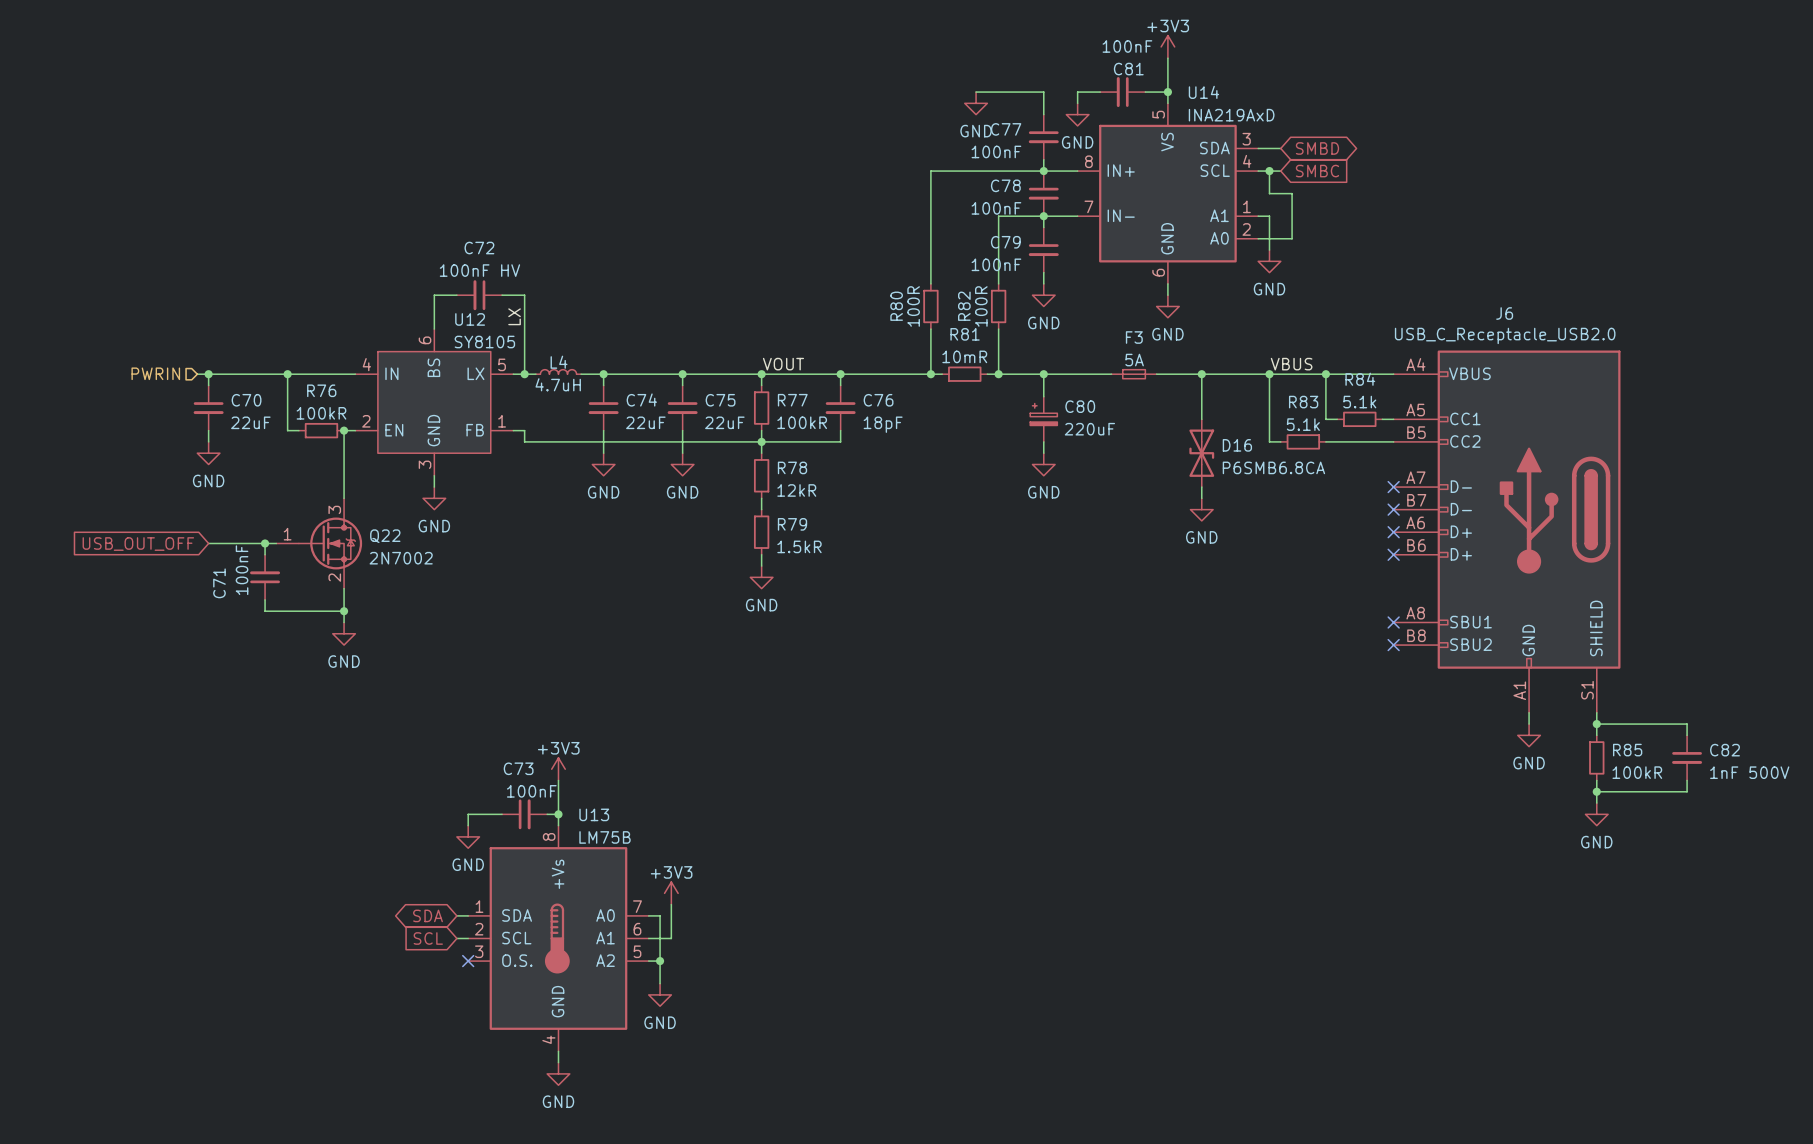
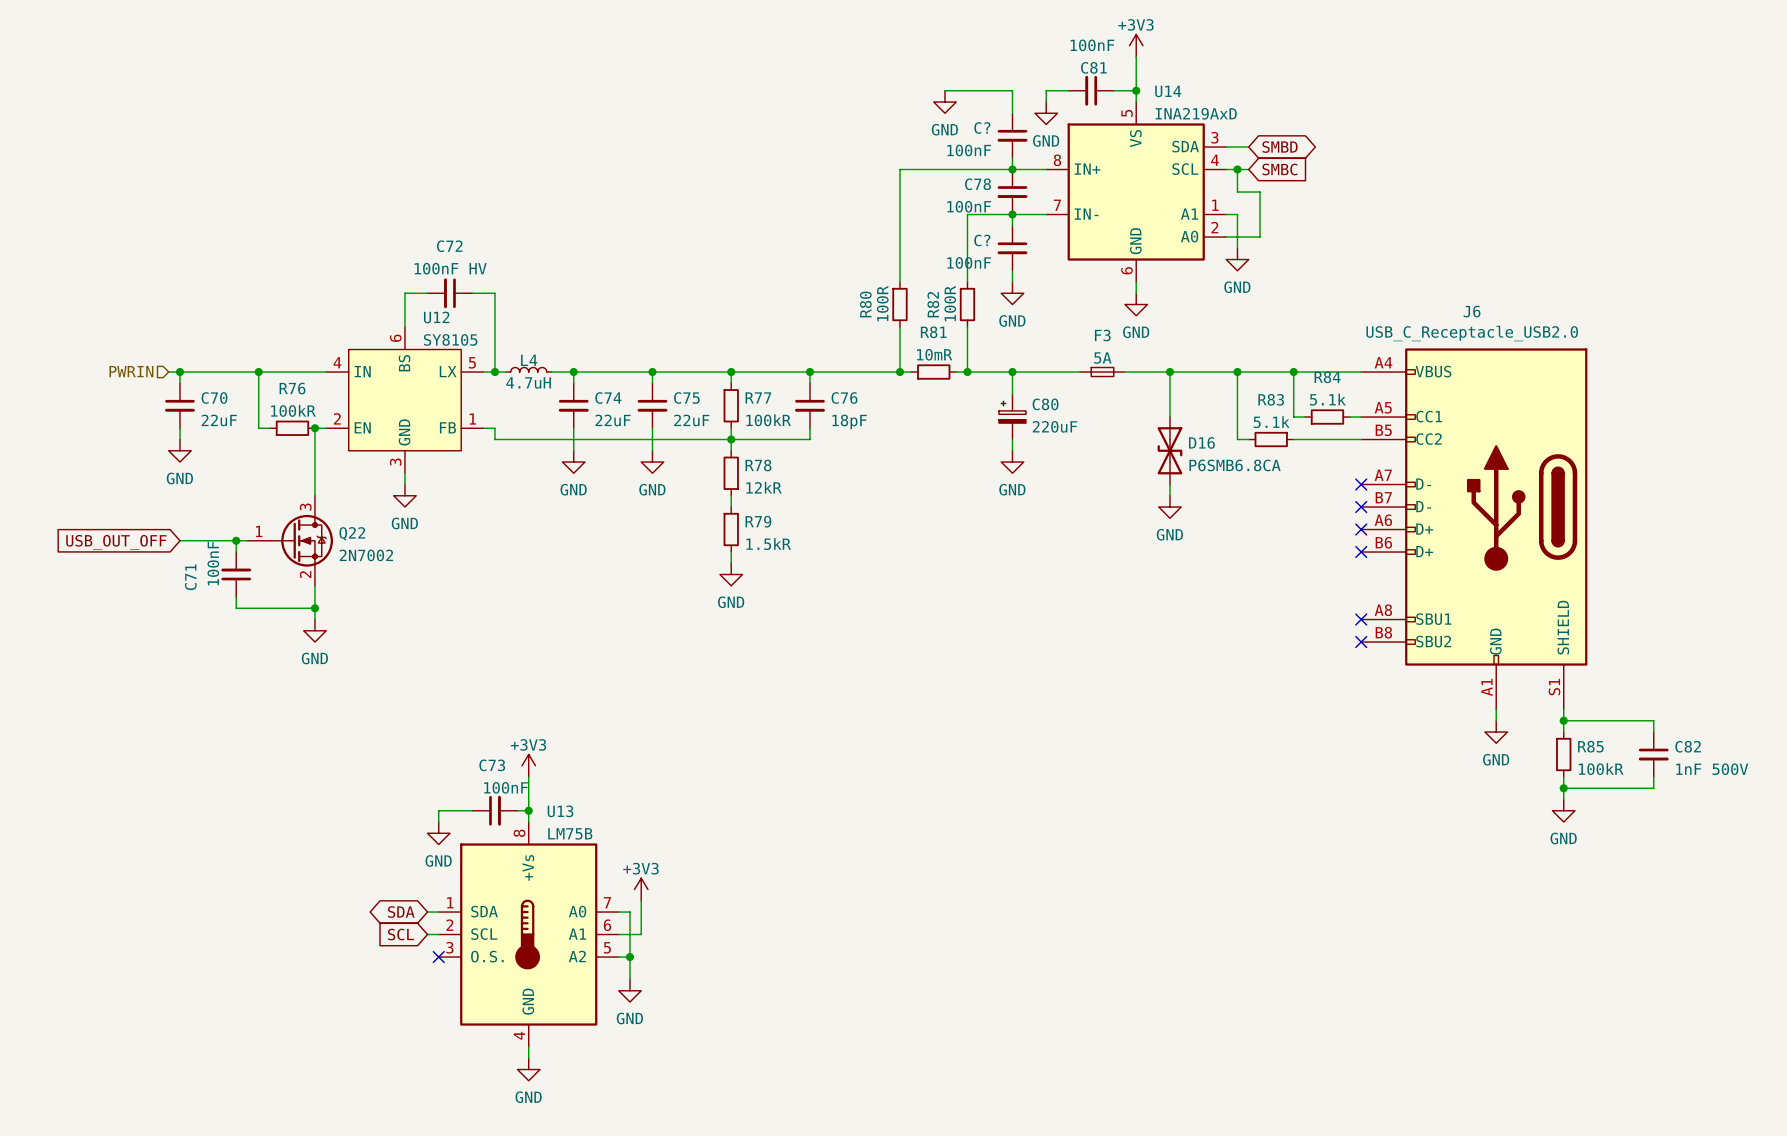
C77 name: C77 (1006, 129) -> C? (982, 128)
C79 name: C79 (1005, 242) -> C? (982, 240)
label: LX (514, 316) -> none
label: VOUT (783, 364) -> none
label: VBUS (1291, 364) -> none

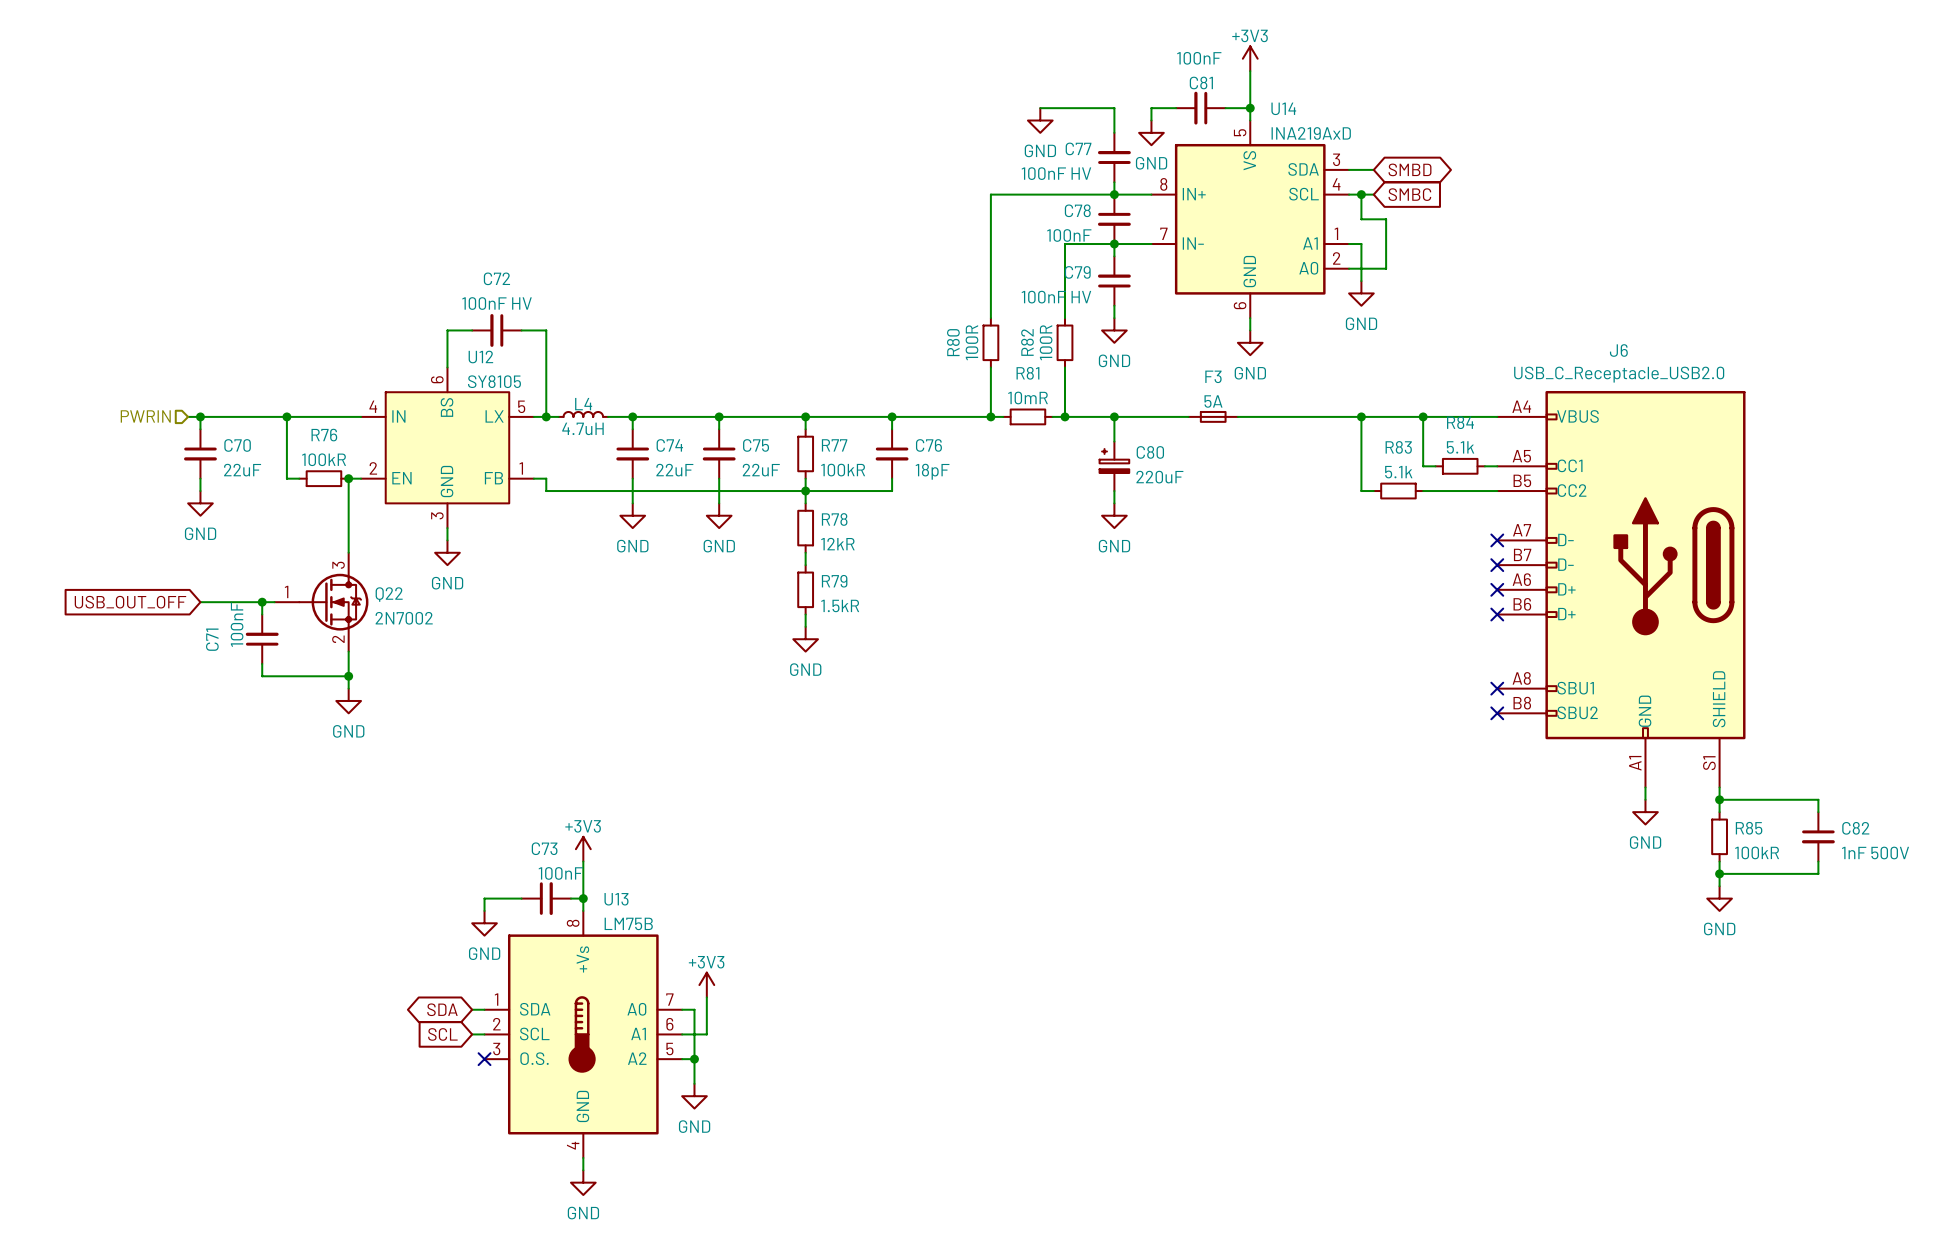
C?: 100nF (1012, 135) -> none
C77: none -> 100nF HV (1114, 157)
C?: 100nF (1012, 248) -> none
C79: none -> 100nF HV (1114, 281)
wire: (1169, 372) (1169, 417) -> none
junction: (1169, 372) -> none
D16: P6SMB6.8CA (1169, 450) -> none
wire: (1169, 484) (1169, 495) -> none
power symbol: GND (1169, 507) -> none

